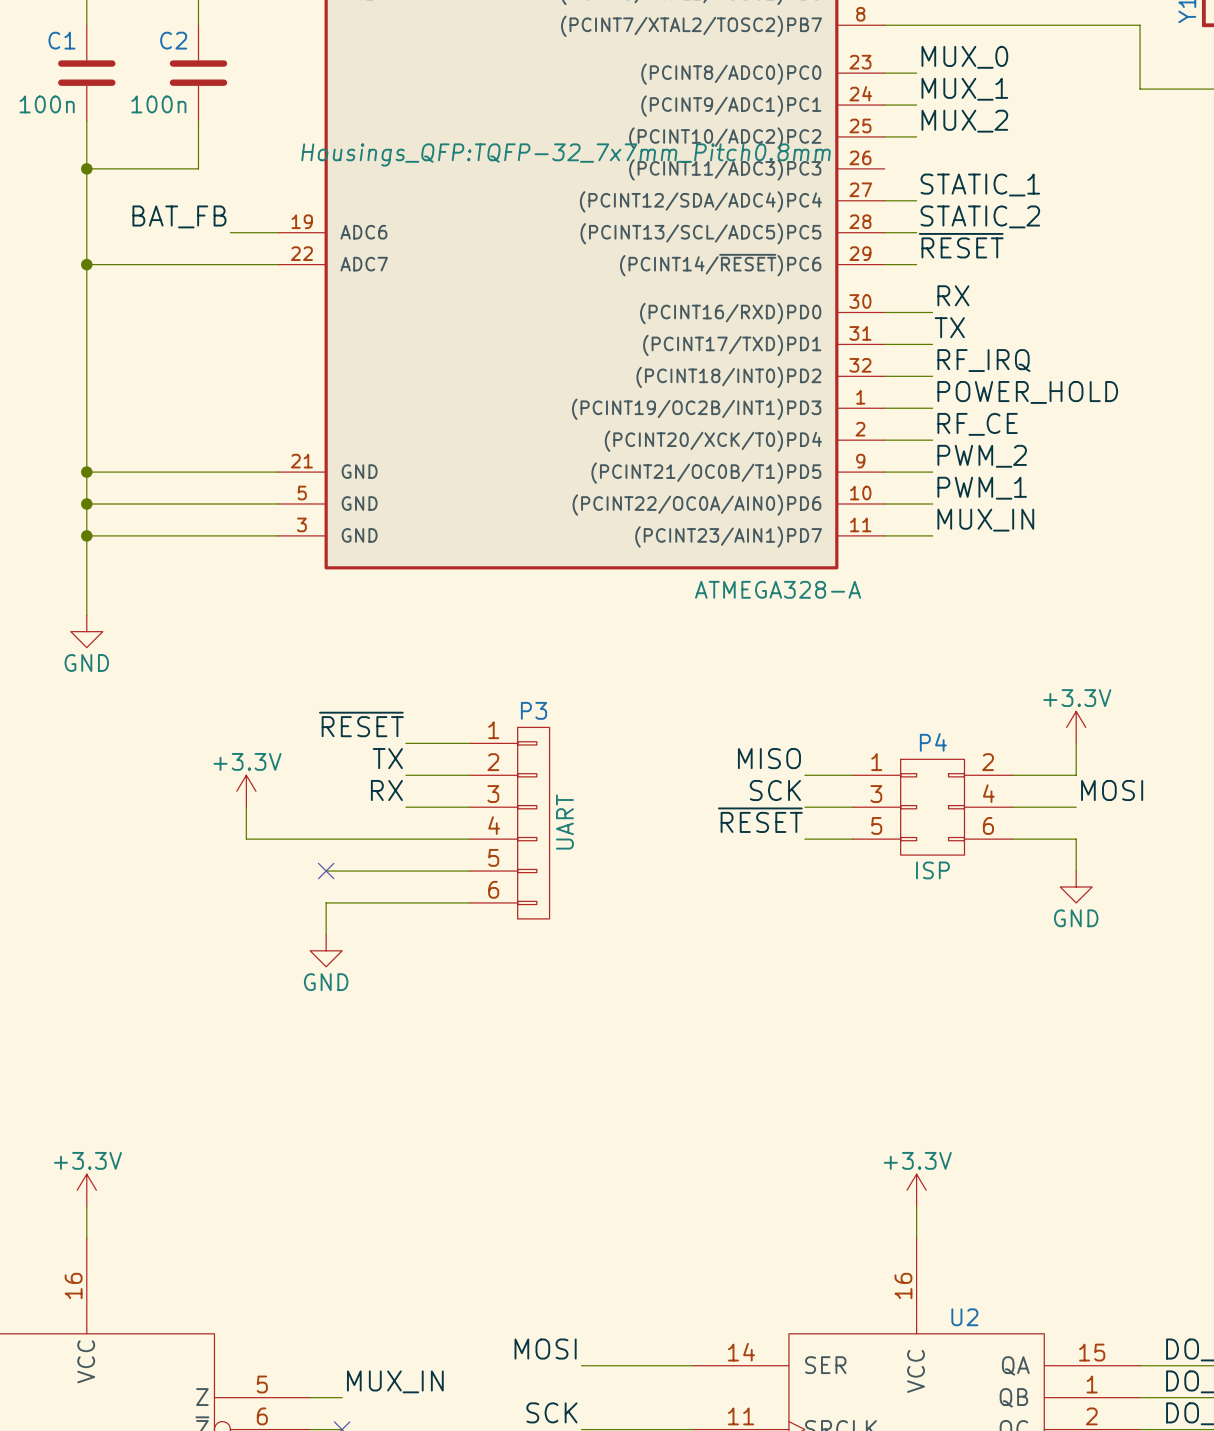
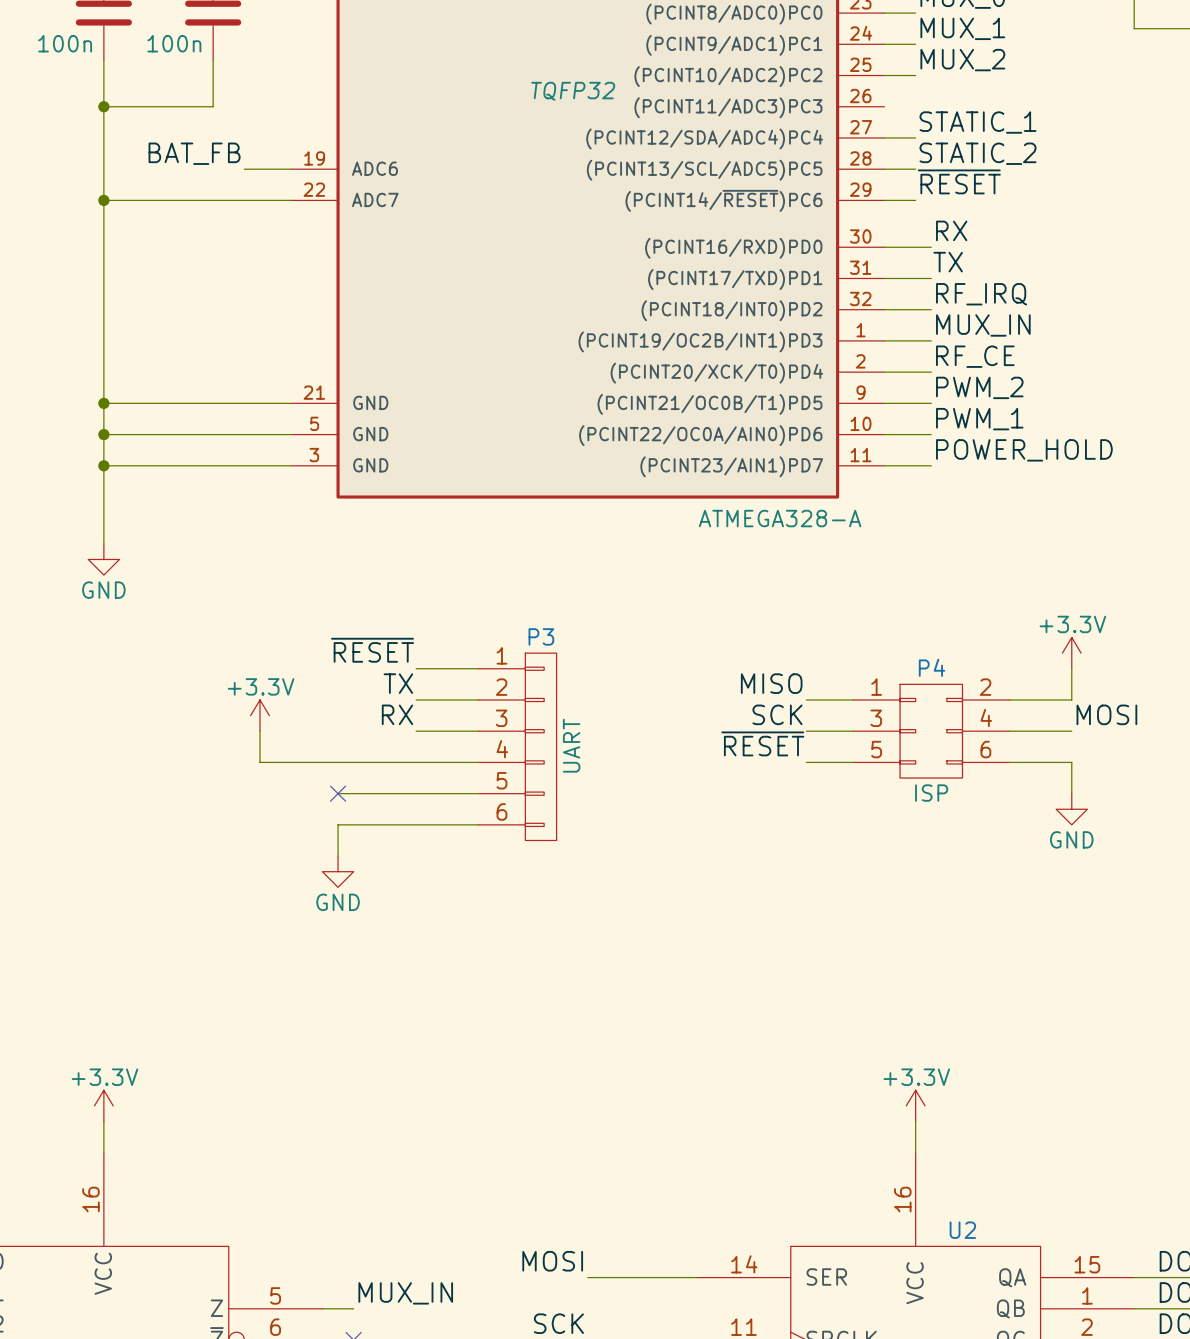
part text: Housings_QFP:TQFP-32_7x7mm_Pitch0.8mm (566, 154) -> TQFP32 (573, 91)
label: POWER_HOLD (1027, 392) -> MUX_IN (983, 325)
label: MUX_IN (985, 520) -> POWER_HOLD (1024, 450)

